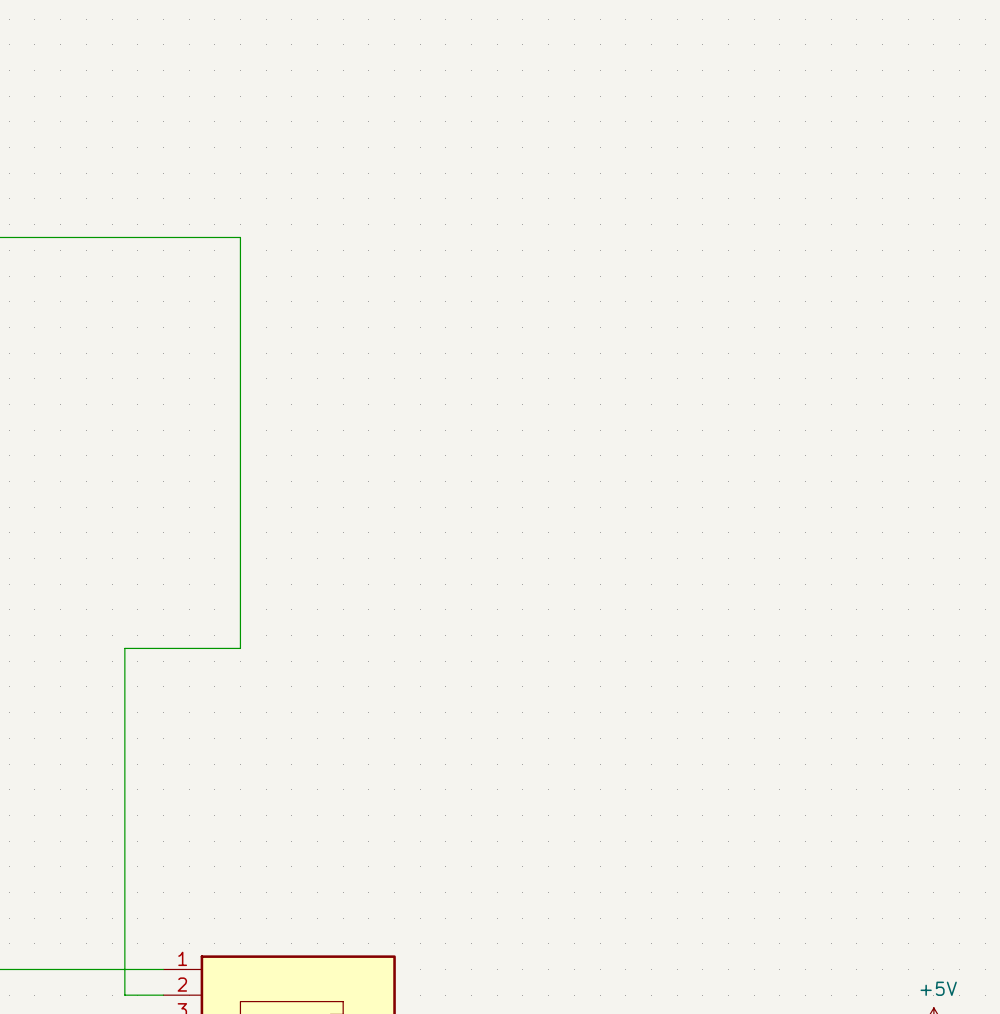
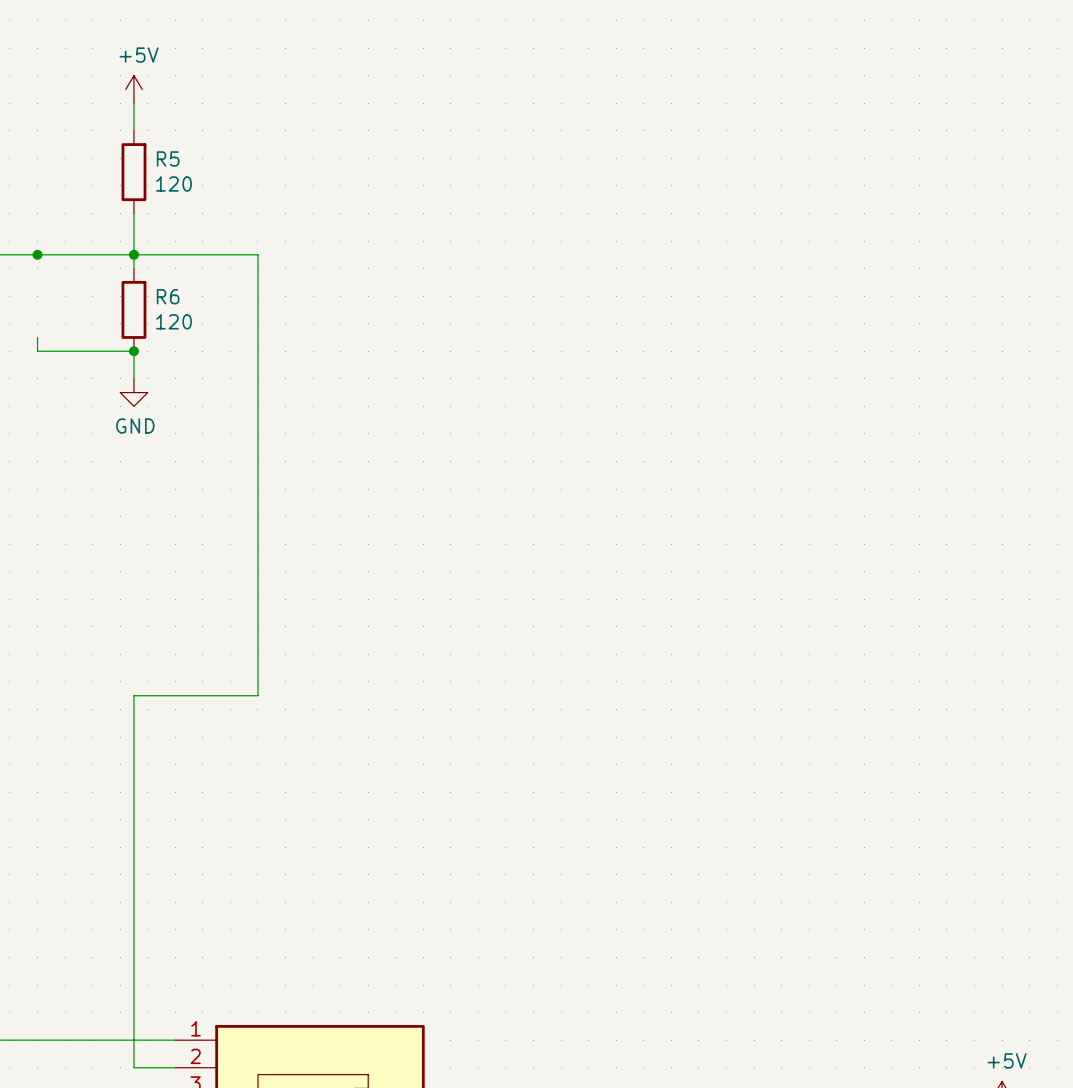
power symbol: none -> +5V (133, 89)
wire: none -> (133, 103) (133, 130)
R5: none -> 120 (133, 172)
wire: none -> (133, 213) (133, 268)
junction: none -> (37, 254)
junction: none -> (133, 254)
R6: none -> 120 (133, 309)
wire: none -> (37, 337) (37, 351) (133, 351) (133, 378)
junction: none -> (133, 351)
power symbol: none -> GND (133, 392)

